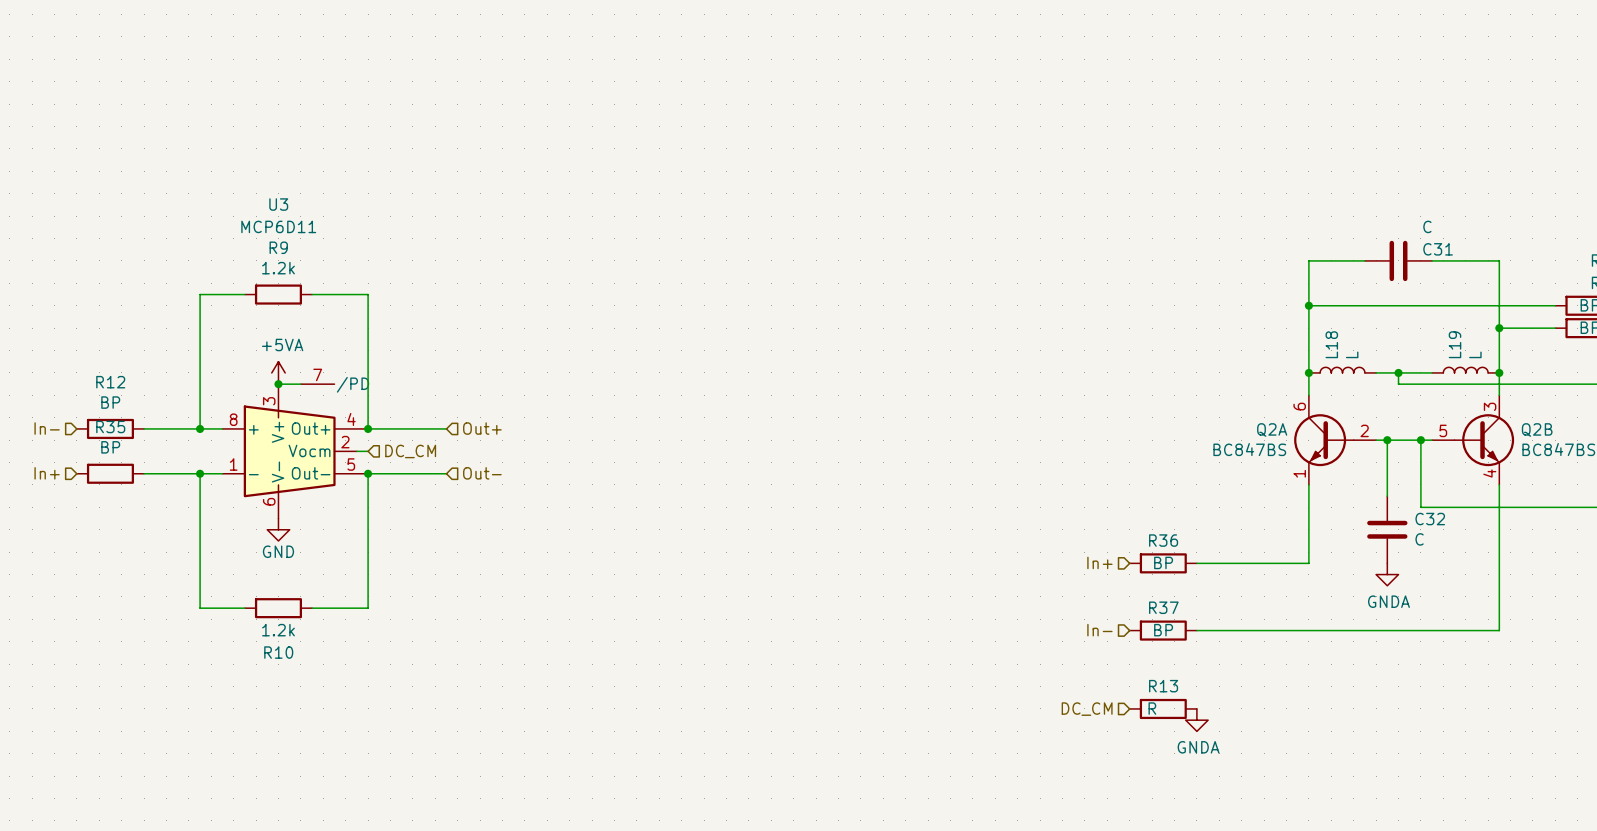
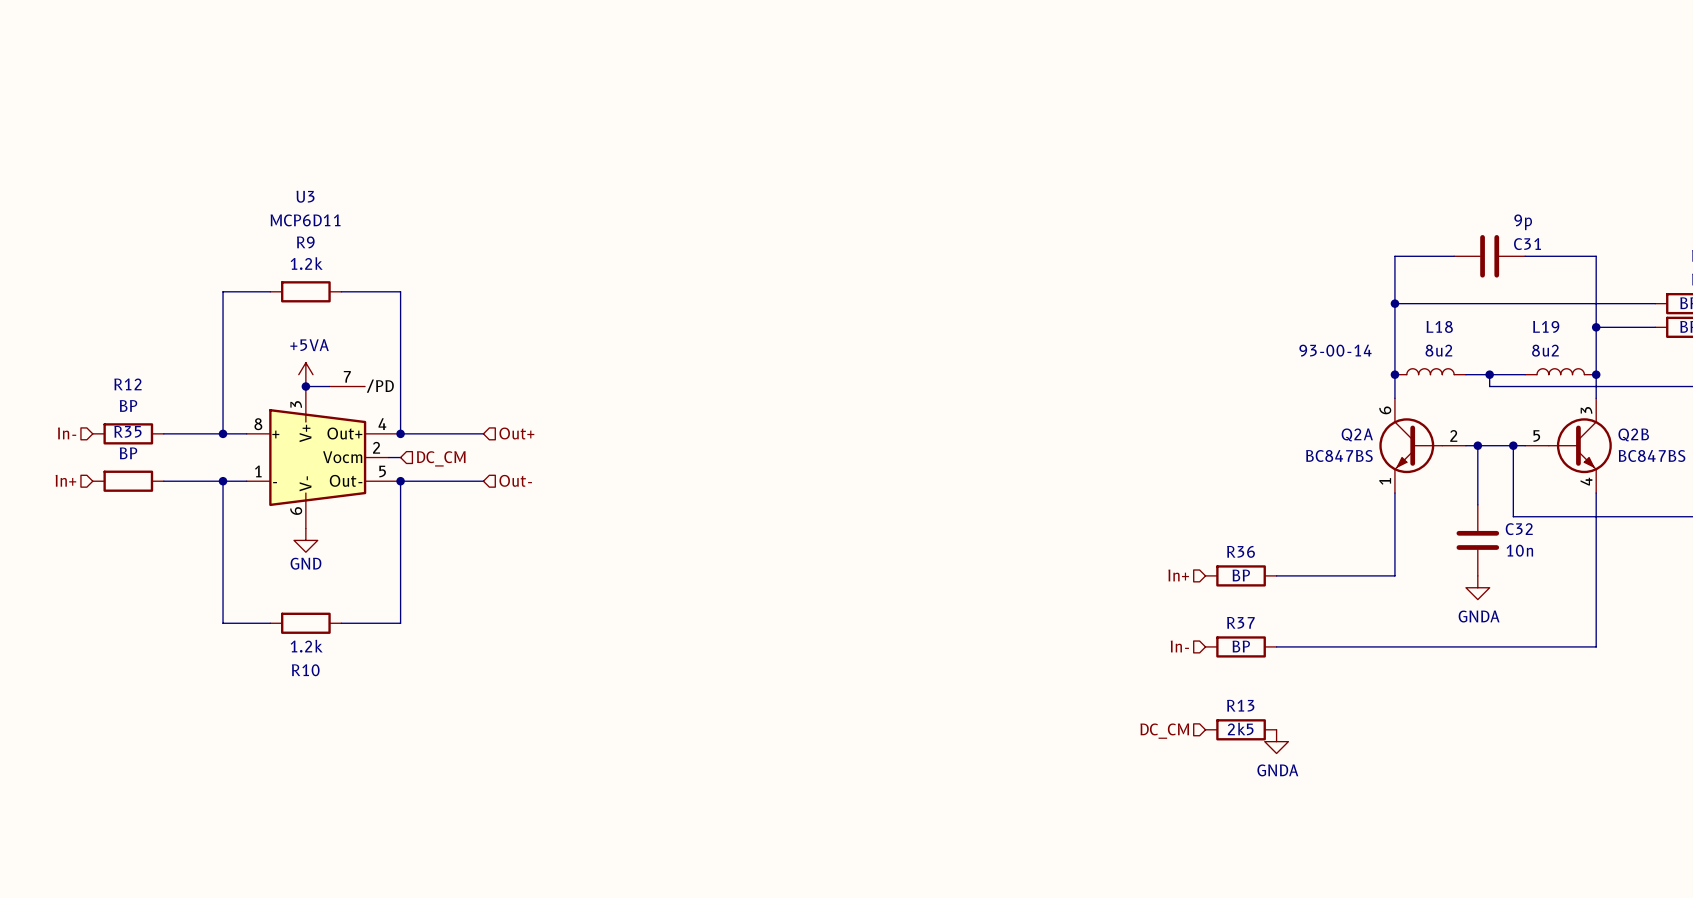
C31 value: C (1427, 226) -> 9p (1523, 222)
L18 name rotation: 0° (1331, 344) -> 90° clockwise (1439, 326)
L19 name rotation: 0° (1455, 344) -> 90° clockwise (1546, 326)
L18 text: none -> 93-00-14 (1335, 350)
L18 value: L (1352, 354) -> 8u2 (1438, 350)
L19 value: L (1475, 354) -> 8u2 (1545, 350)
C32 value: C (1419, 539) -> 10n (1519, 550)
R13 value: R (1152, 708) -> 2k5 (1240, 728)

